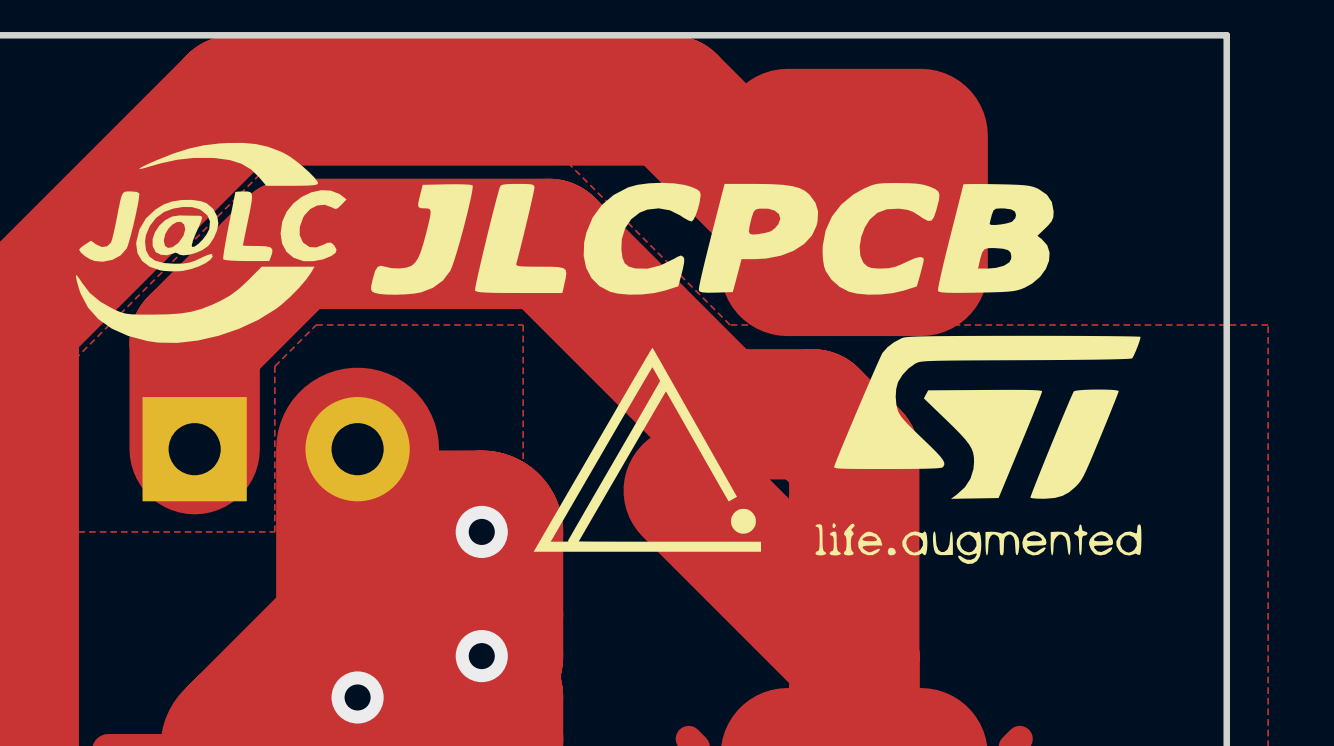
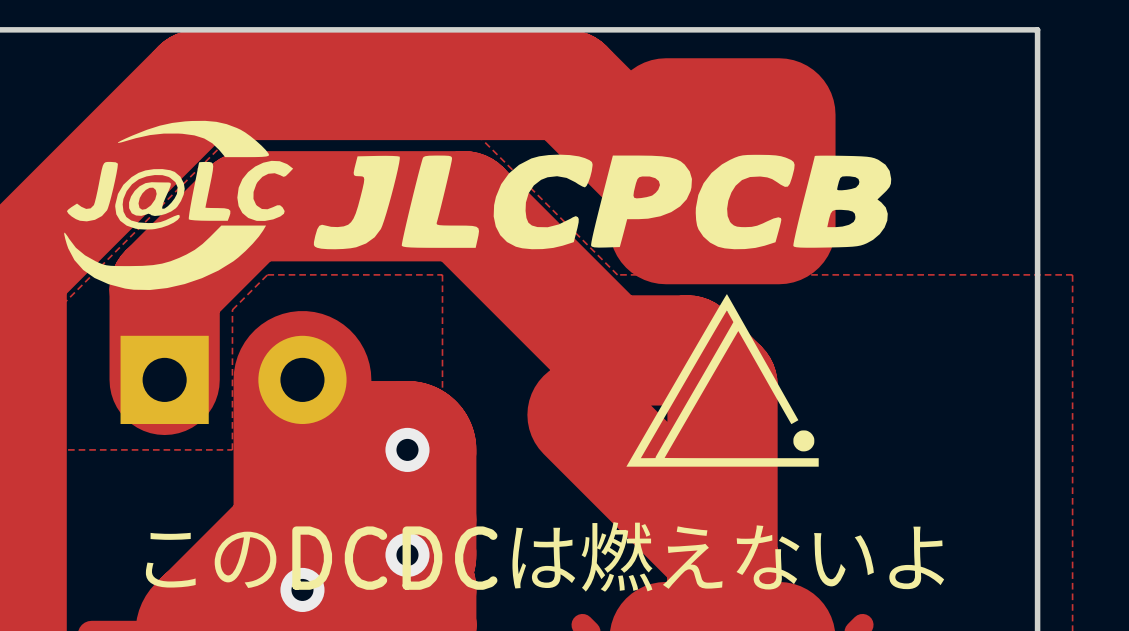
drawing: [815, 335, 1142, 565] -> none
drawing position: (647, 449) -> (722, 380)
text: none -> このDCDCは燃えないよ (545, 556)

